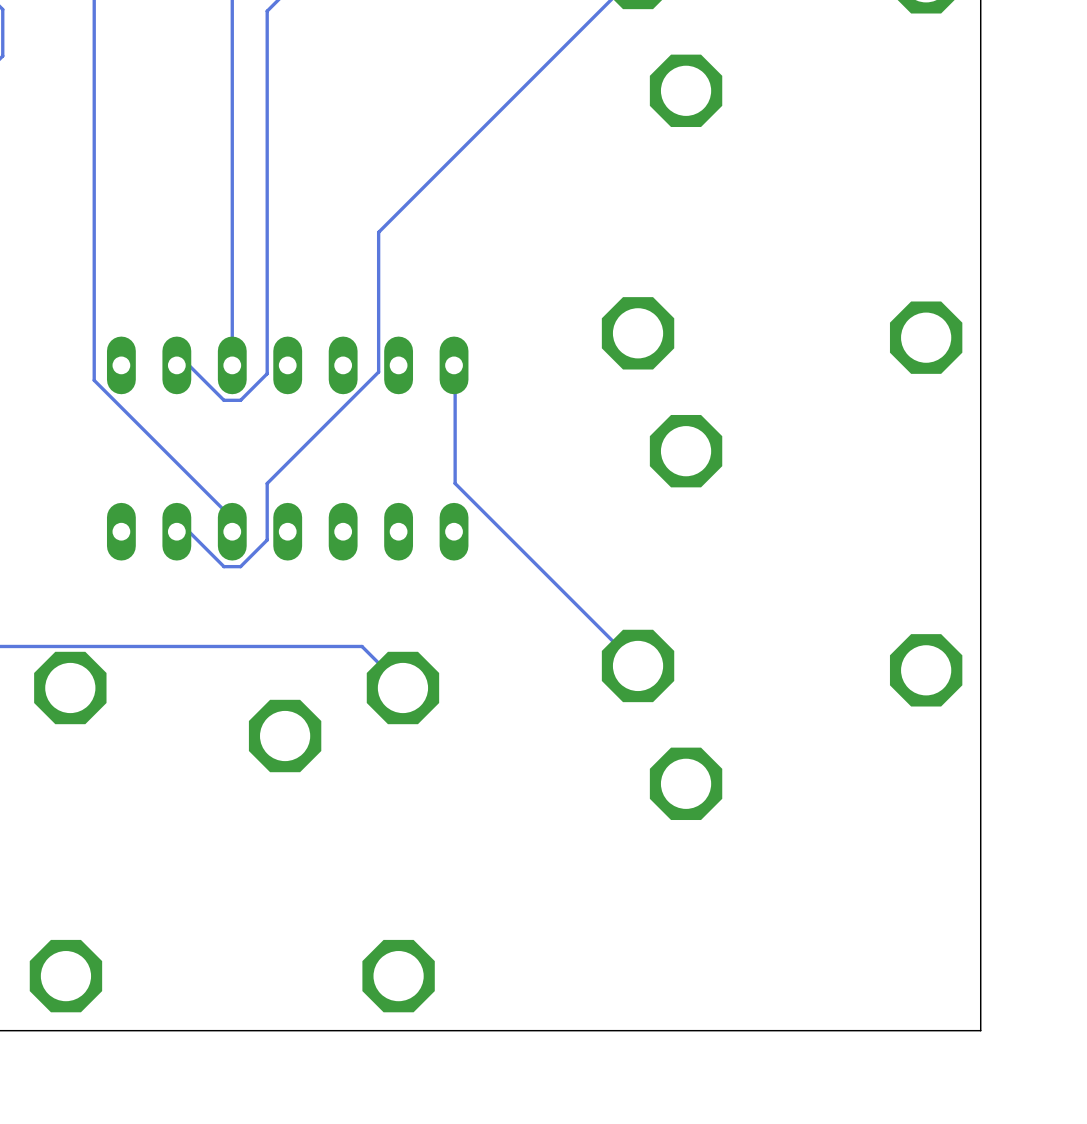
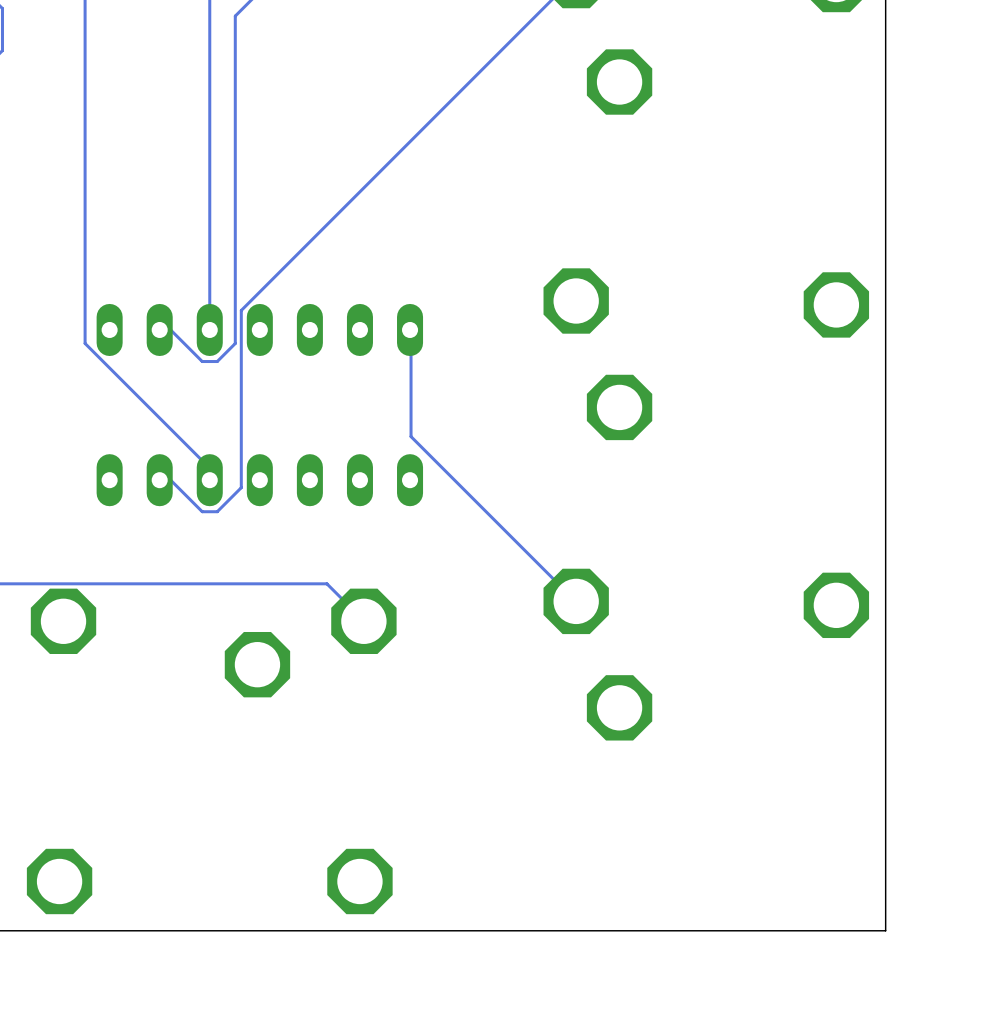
track: (267, 11) (267, 343) -> (241, 10) (235, 16) (235, 343)
track: (378, 232) (378, 372) (267, 483) -> (341, 209) (241, 310)
track: (267, 373) (260, 380) -> (241, 337) (241, 436)

